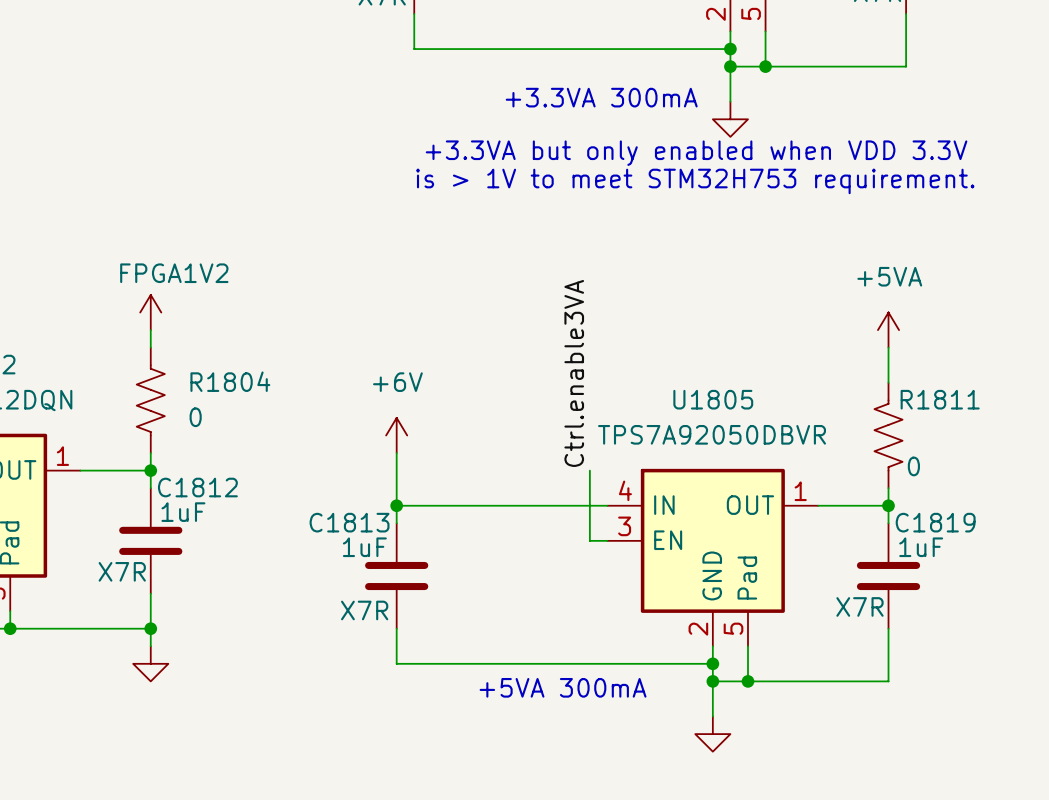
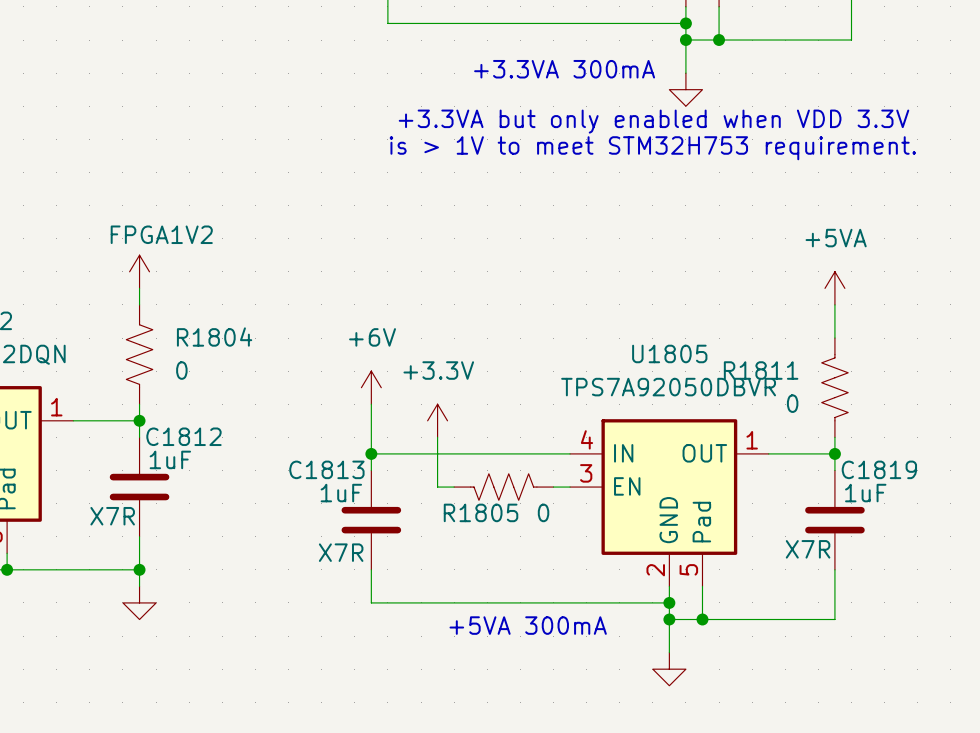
label: Ctrl.enable3VA (574, 373) -> none
R1811 name position: R1811 (940, 399) -> R1811 (761, 370)
R1811 value position: 0 (913, 466) -> 0 (792, 403)
power symbol: none -> +3.3V (437, 420)
wire: (589, 470) (589, 540) -> none
wire: none -> (437, 437) (437, 487) (454, 487)
R1805: none -> 0 (503, 487)

